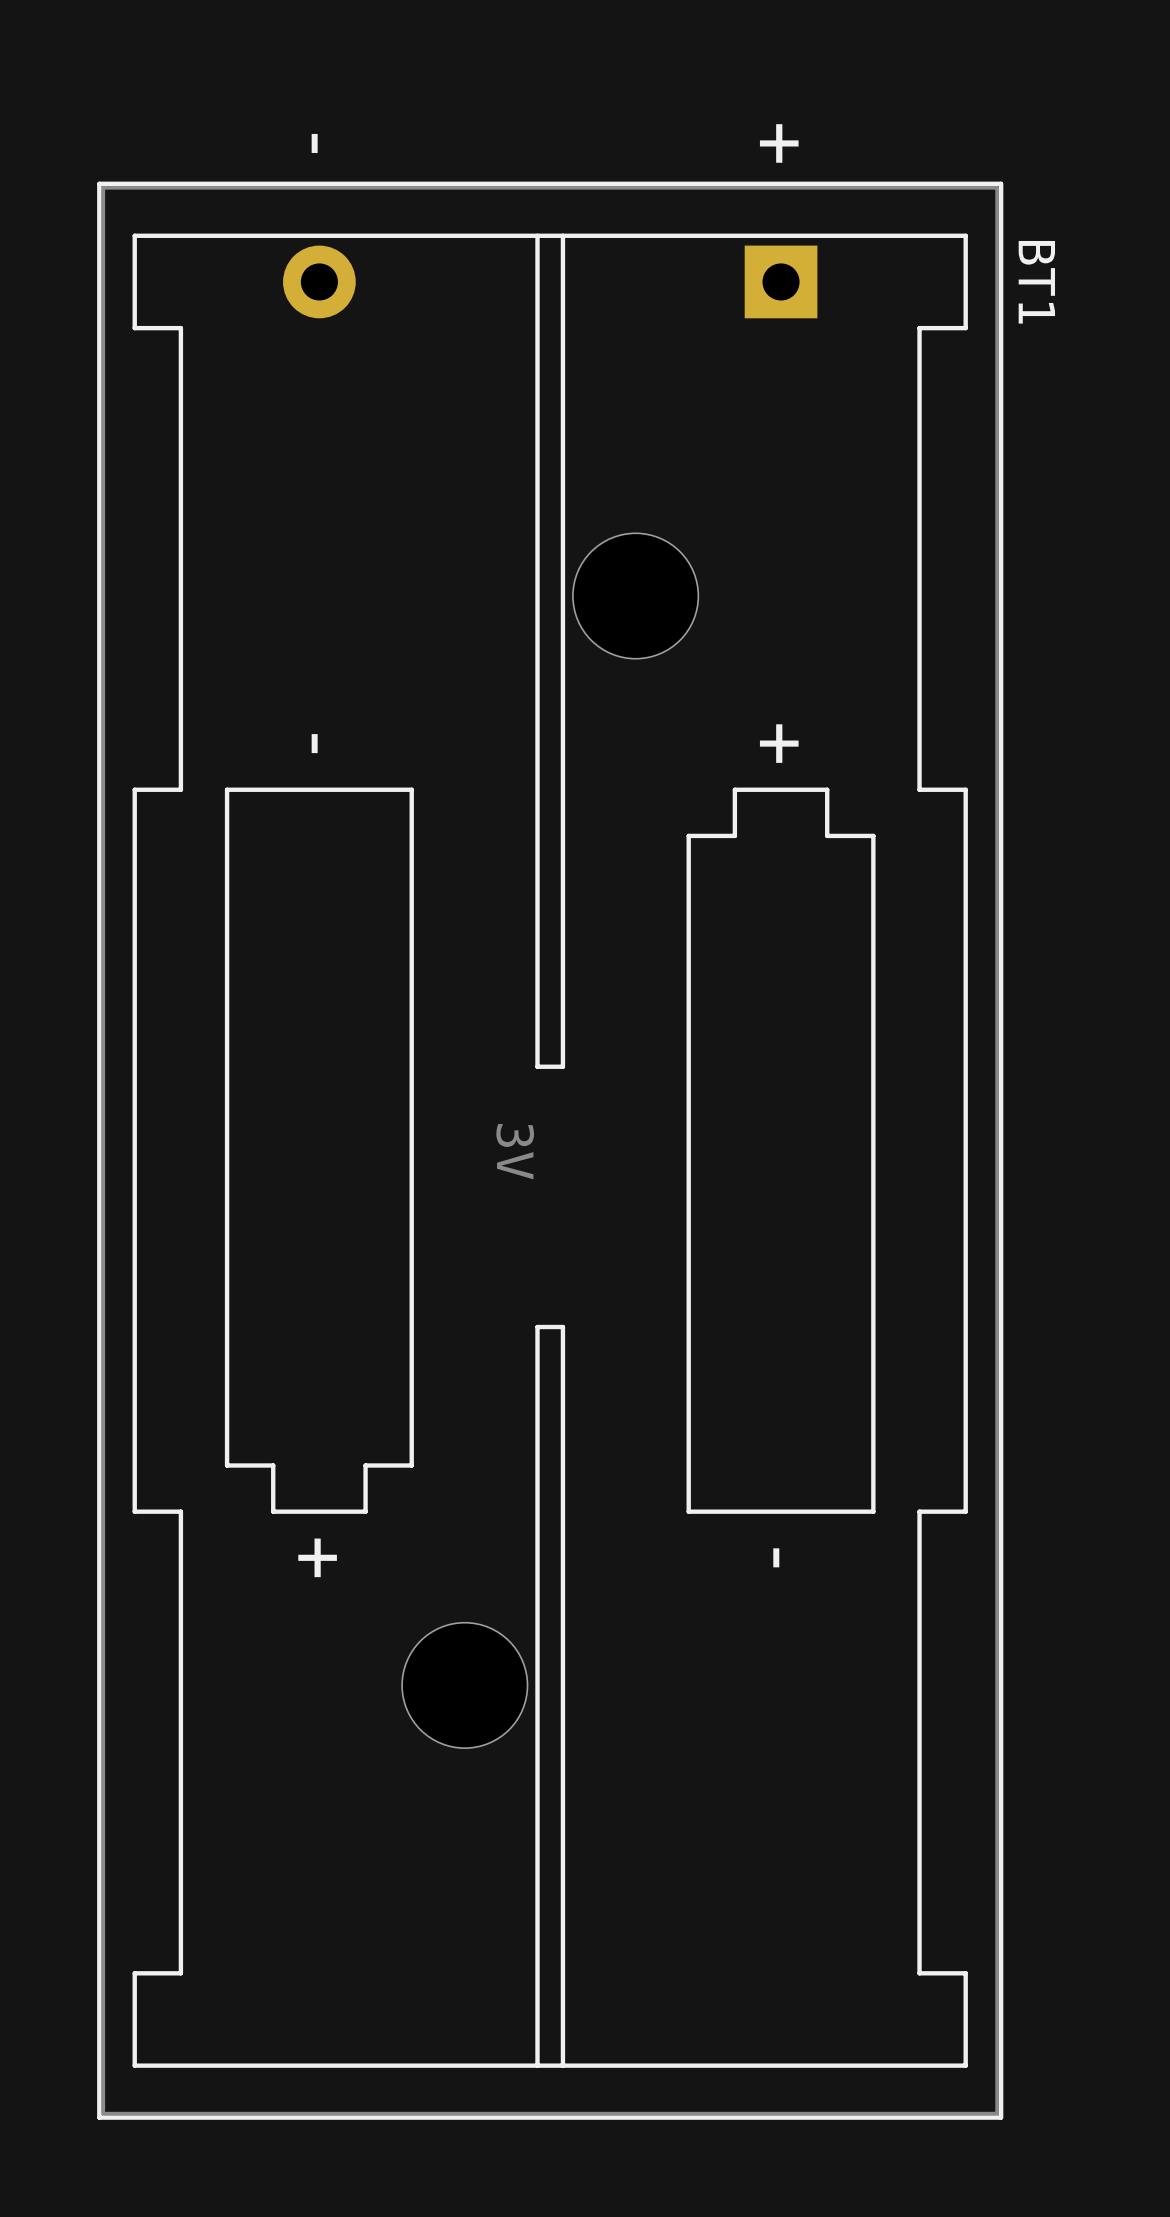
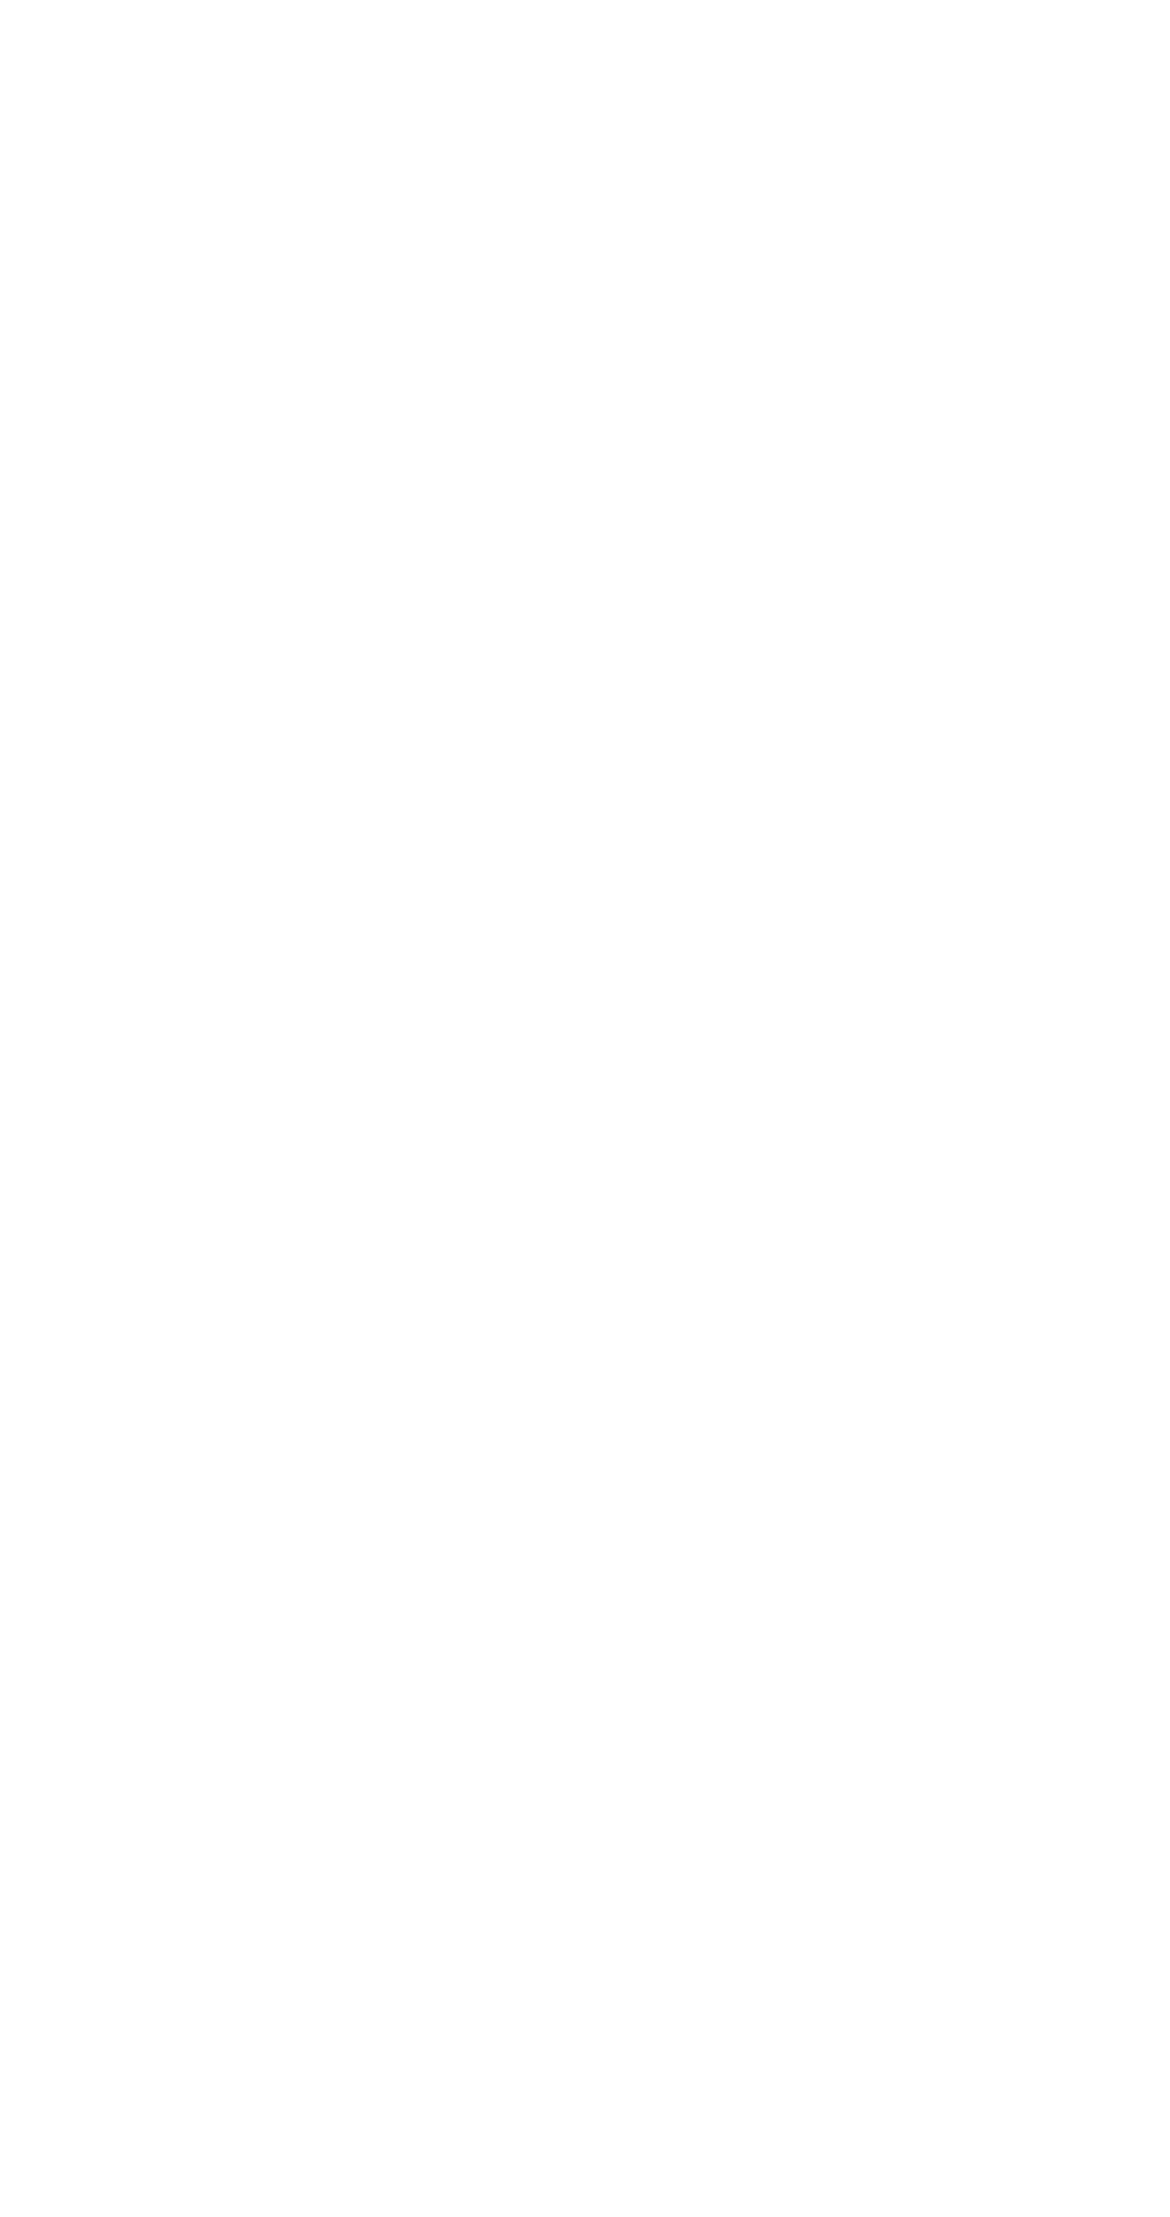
BT1: 3V (550, 1150) -> none

